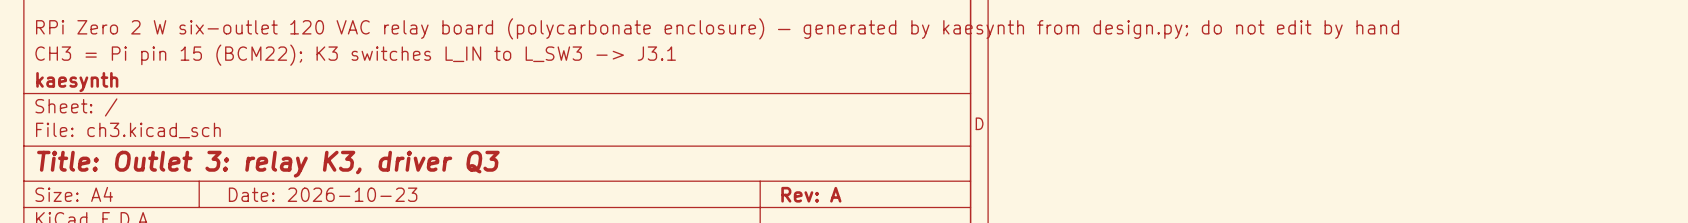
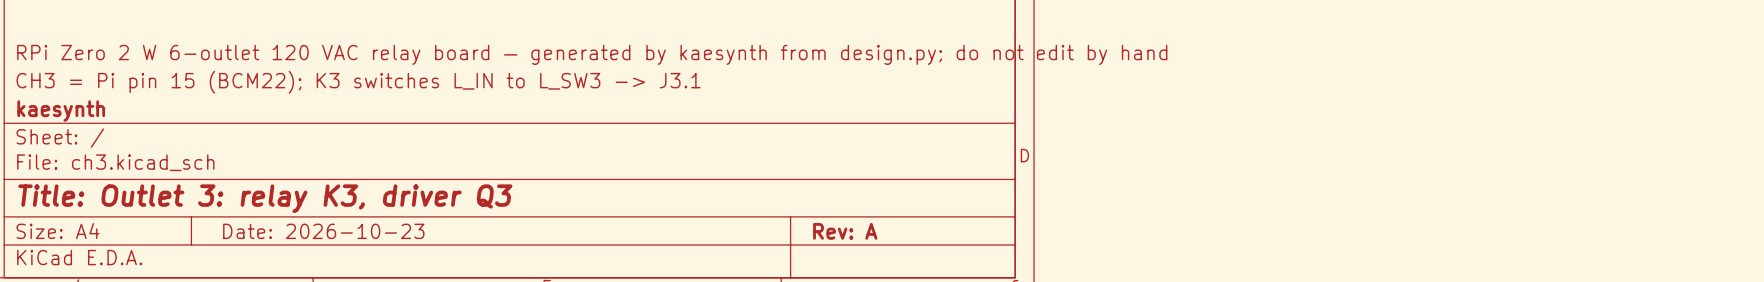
title block: RPi Zero 2 W six-outlet 120 VAC relay board (polycarbonate enclosure) — generated by kaesynth from design.py; do not edit by hand (717, 28) -> RPi Zero 2 W 6-outlet 120 VAC relay board — generated by kaesynth from design.py; do not edit by hand (592, 54)

